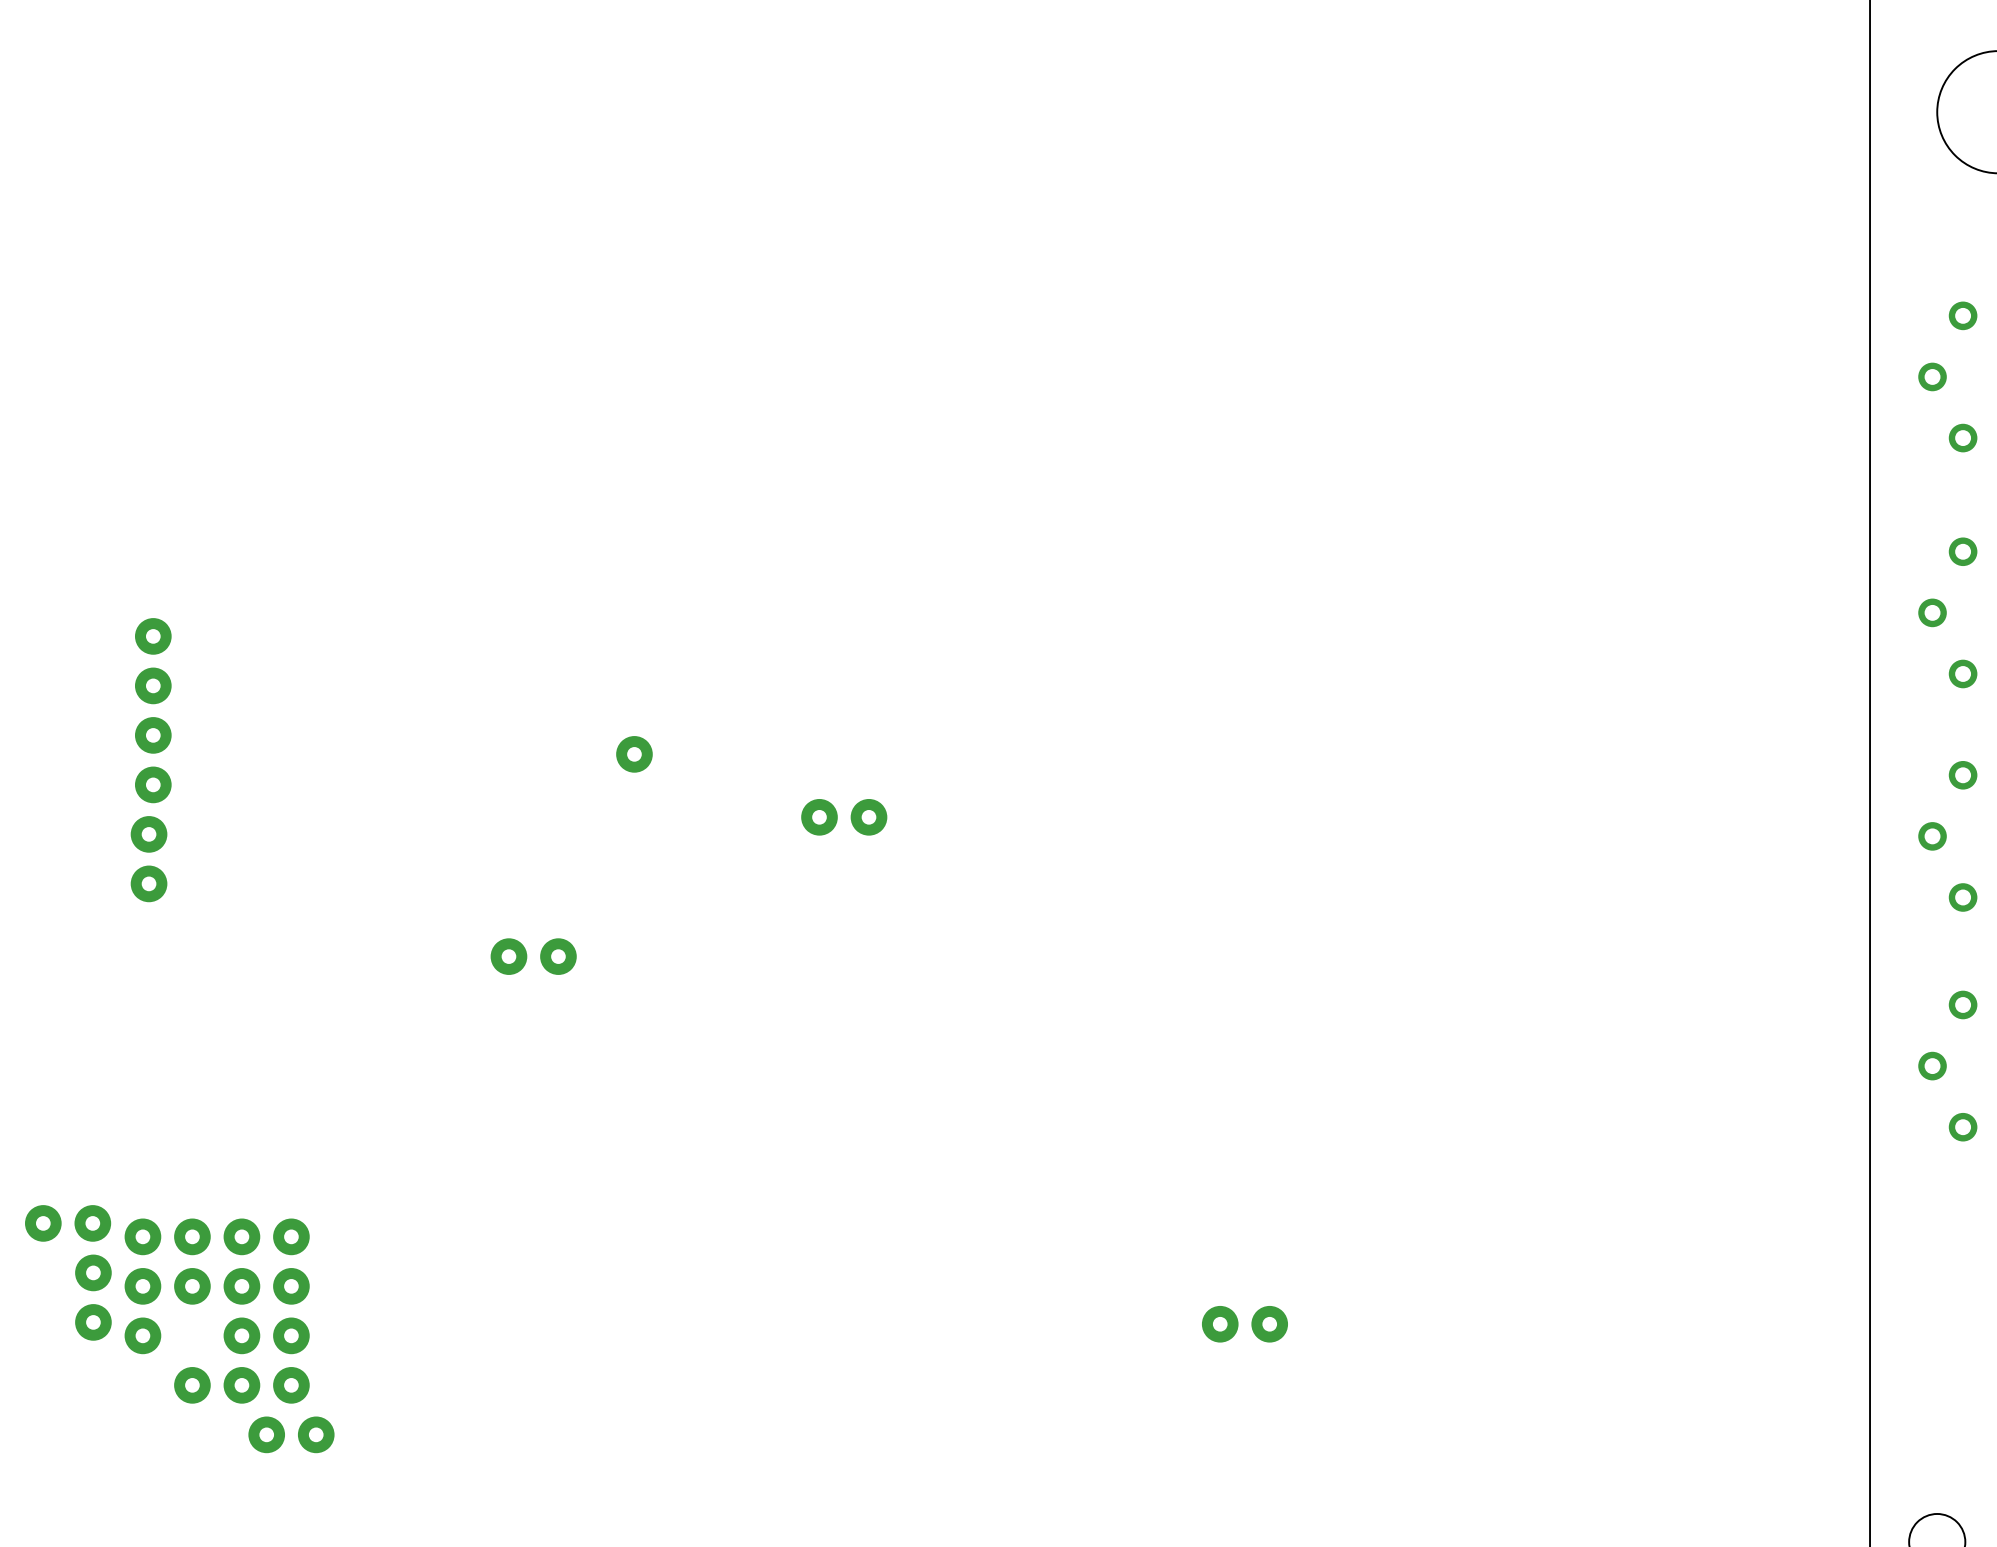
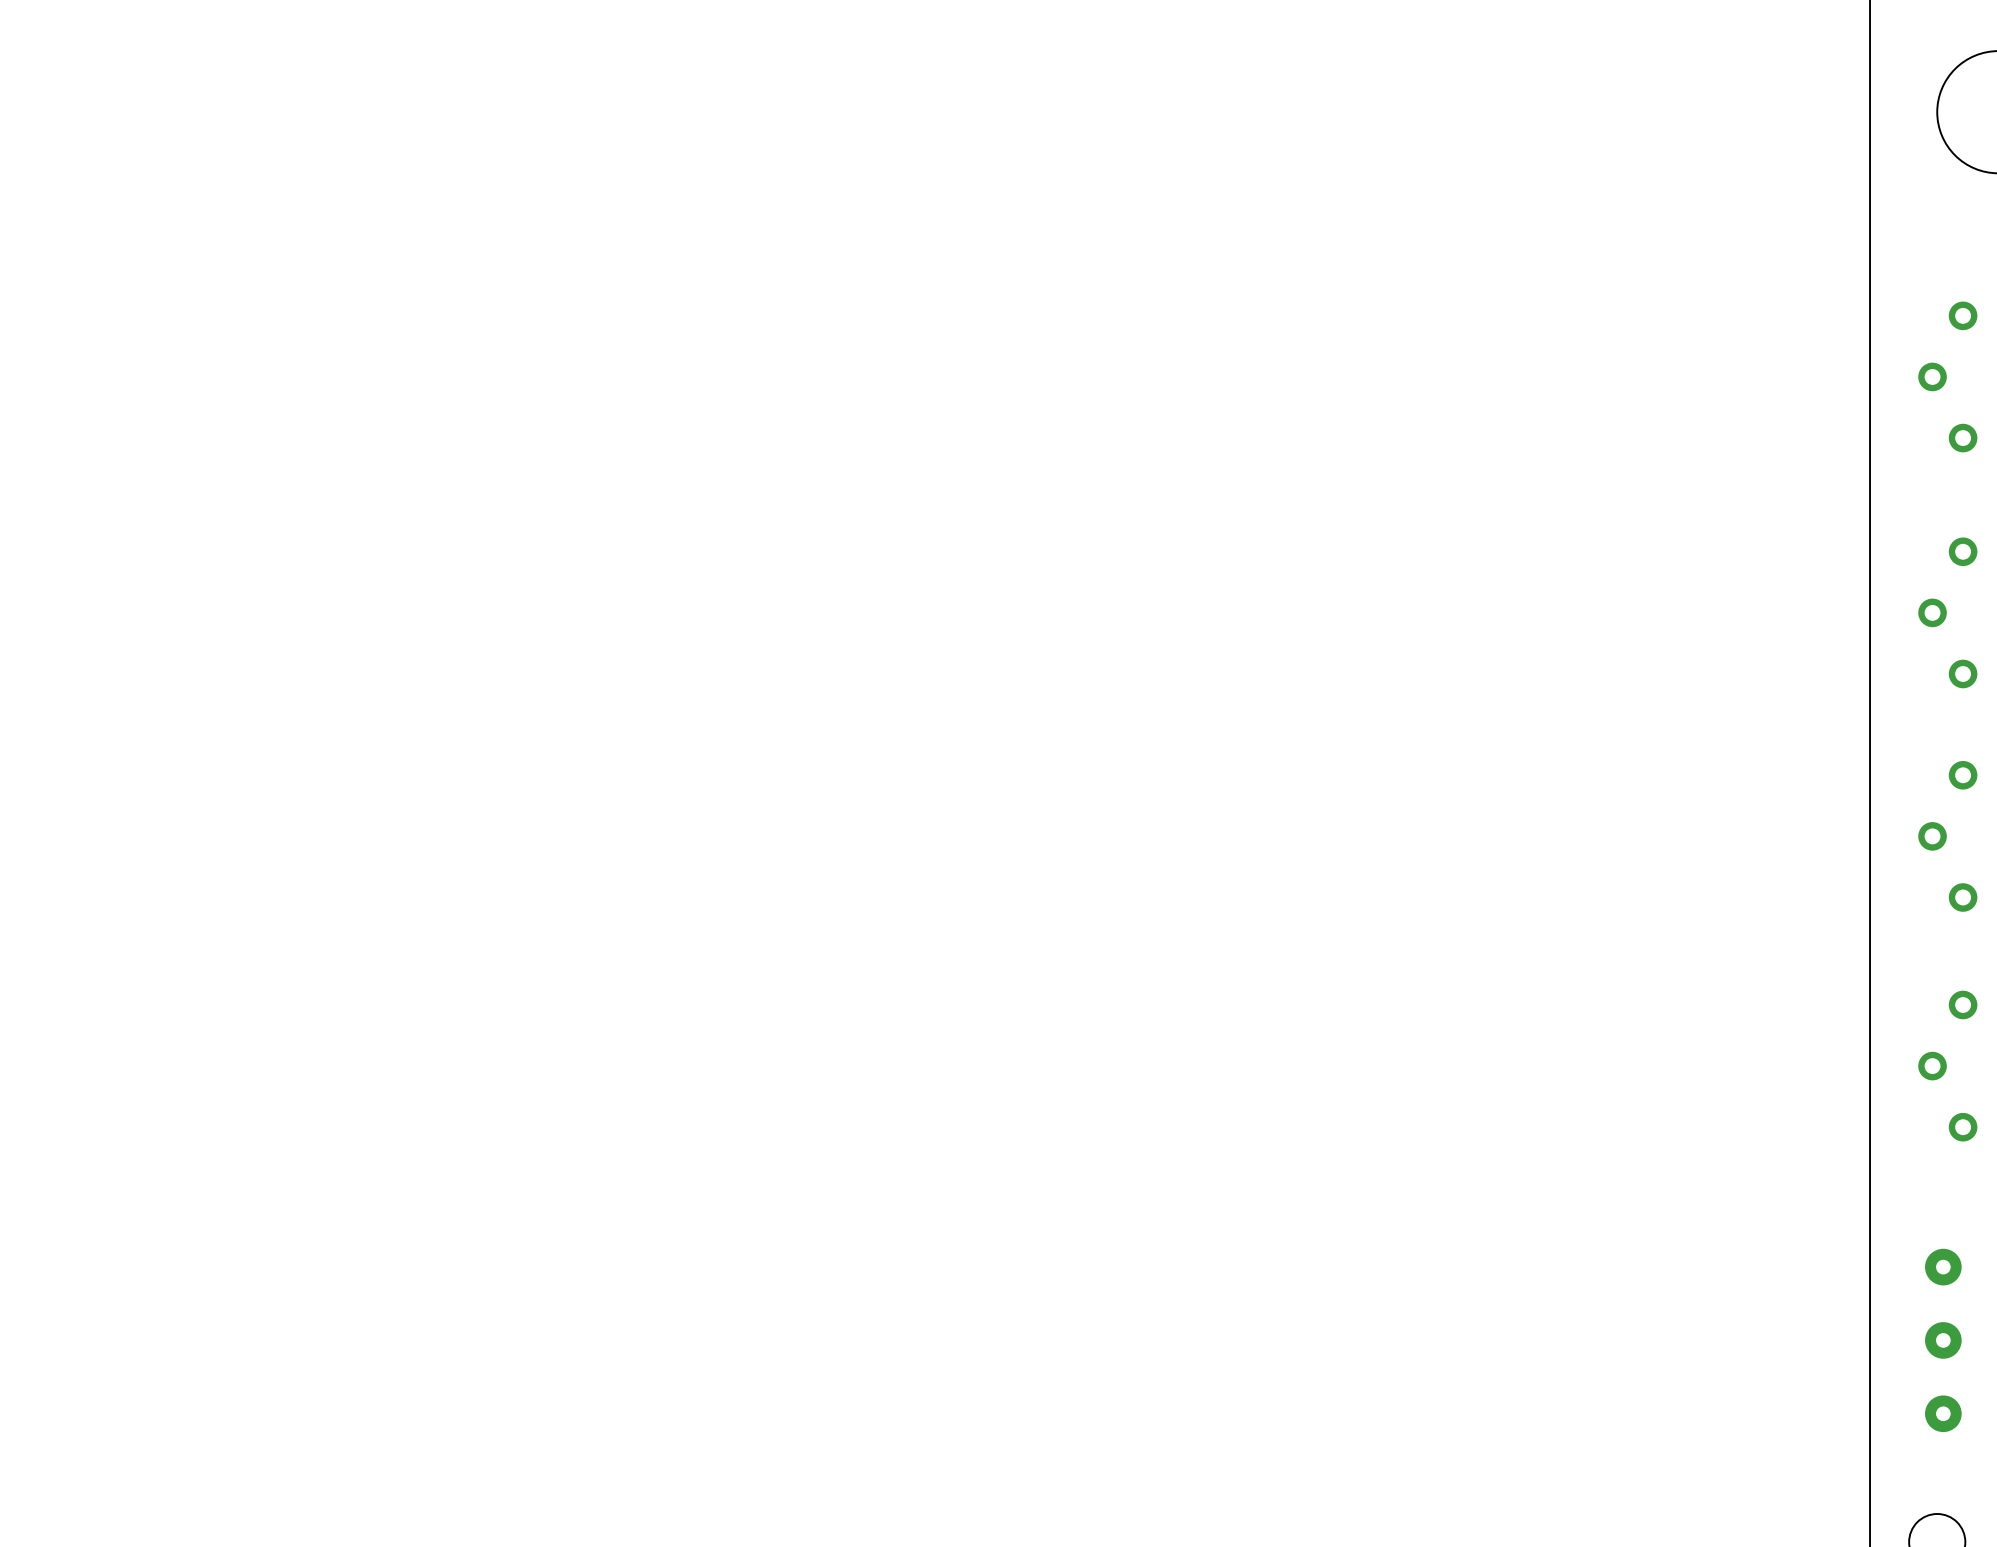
part: (153, 636) -> none
part: (153, 685) -> none
part: (153, 735) -> none
part: (634, 754) -> none
part: (153, 784) -> none
part: (819, 817) -> none
part: (869, 817) -> none
part: (149, 834) -> none
part: (149, 883) -> none
part: (508, 956) -> none
part: (558, 956) -> none
part: (43, 1223) -> none
part: (92, 1223) -> none
part: (142, 1236) -> none
part: (192, 1236) -> none
part: (241, 1236) -> none
part: (291, 1236) -> none
part: none -> (1943, 1267)
part: (93, 1272) -> none
part: (142, 1286) -> none
part: (192, 1286) -> none
part: (241, 1286) -> none
part: (291, 1286) -> none
part: (93, 1322) -> none
part: (1220, 1324) -> none
part: (1269, 1324) -> none
part: (142, 1335) -> none
part: (241, 1335) -> none
part: (291, 1335) -> none
part: none -> (1943, 1340)
part: (192, 1385) -> none
part: (241, 1385) -> none
part: (291, 1385) -> none
part: none -> (1943, 1413)
part: (266, 1434) -> none
part: (316, 1434) -> none

